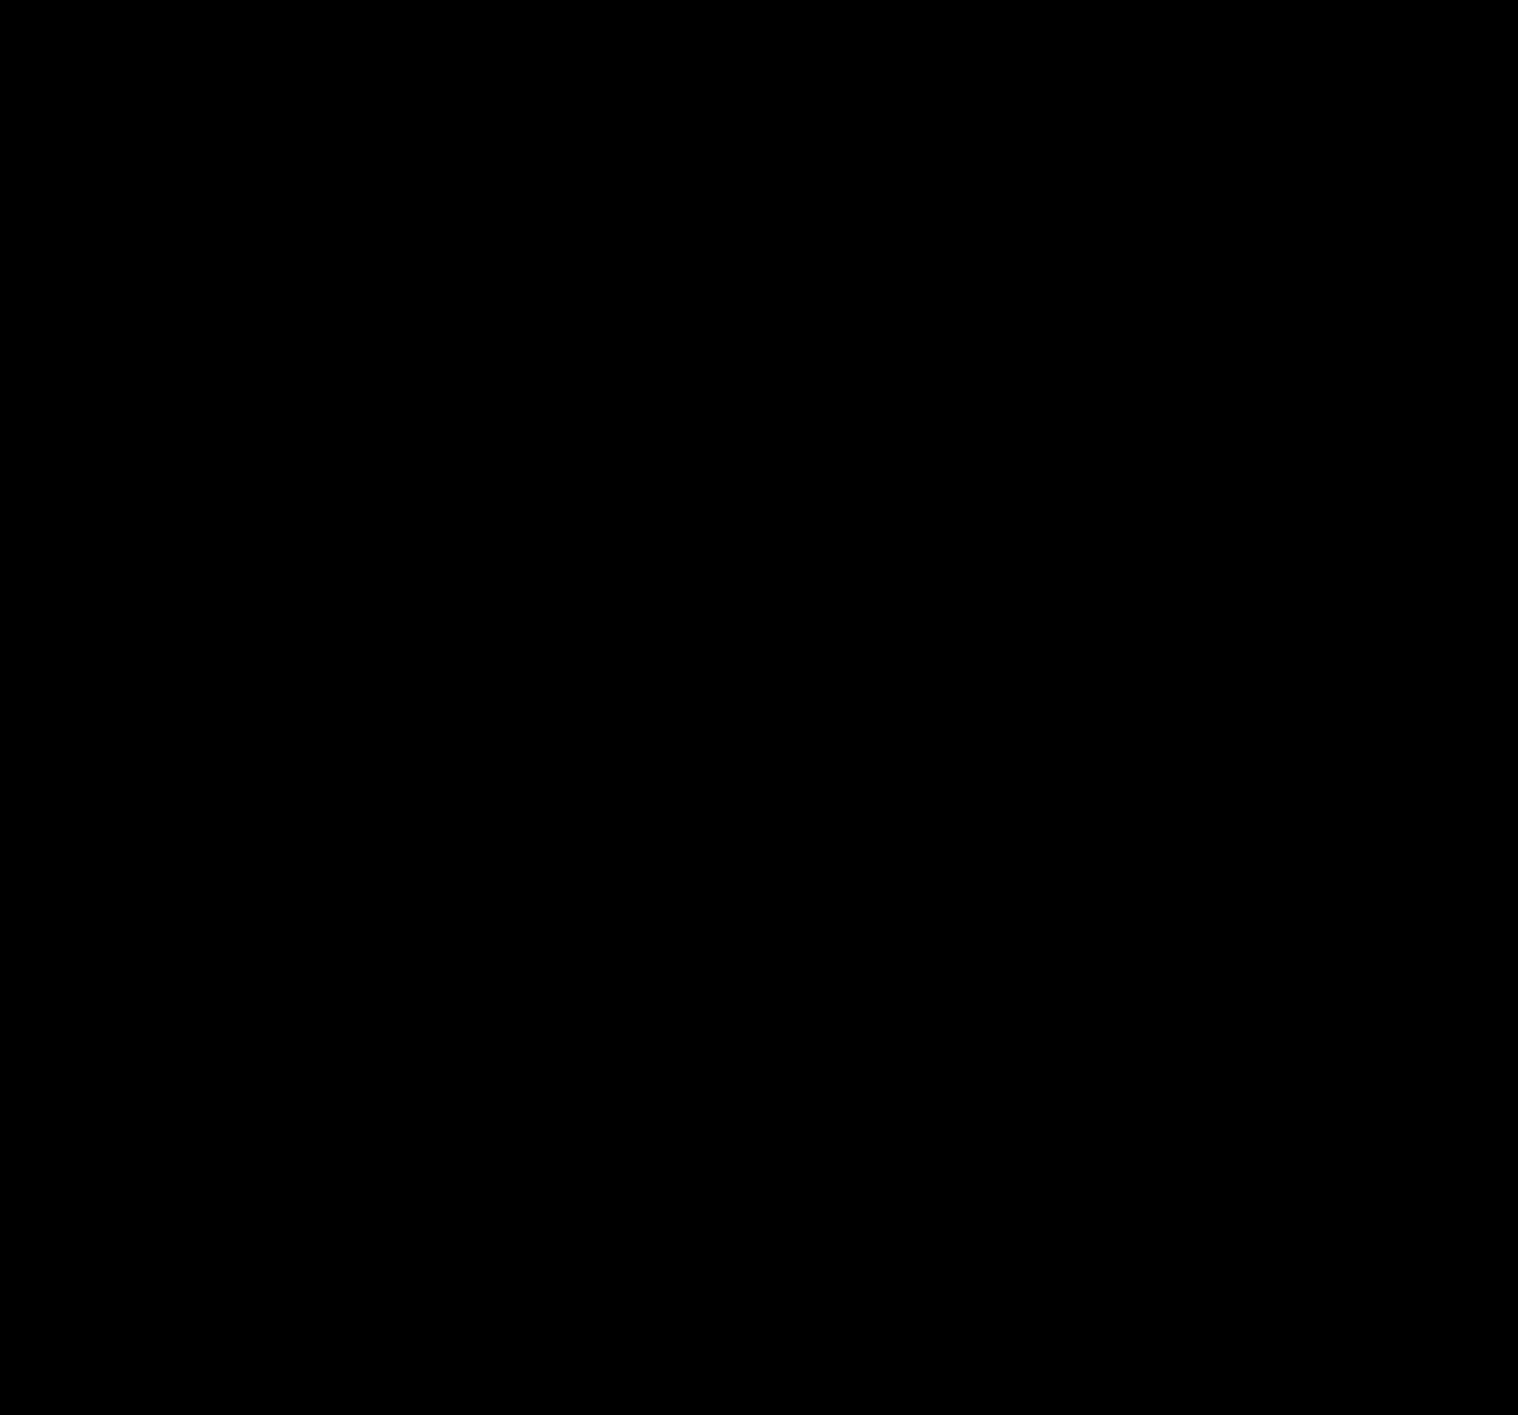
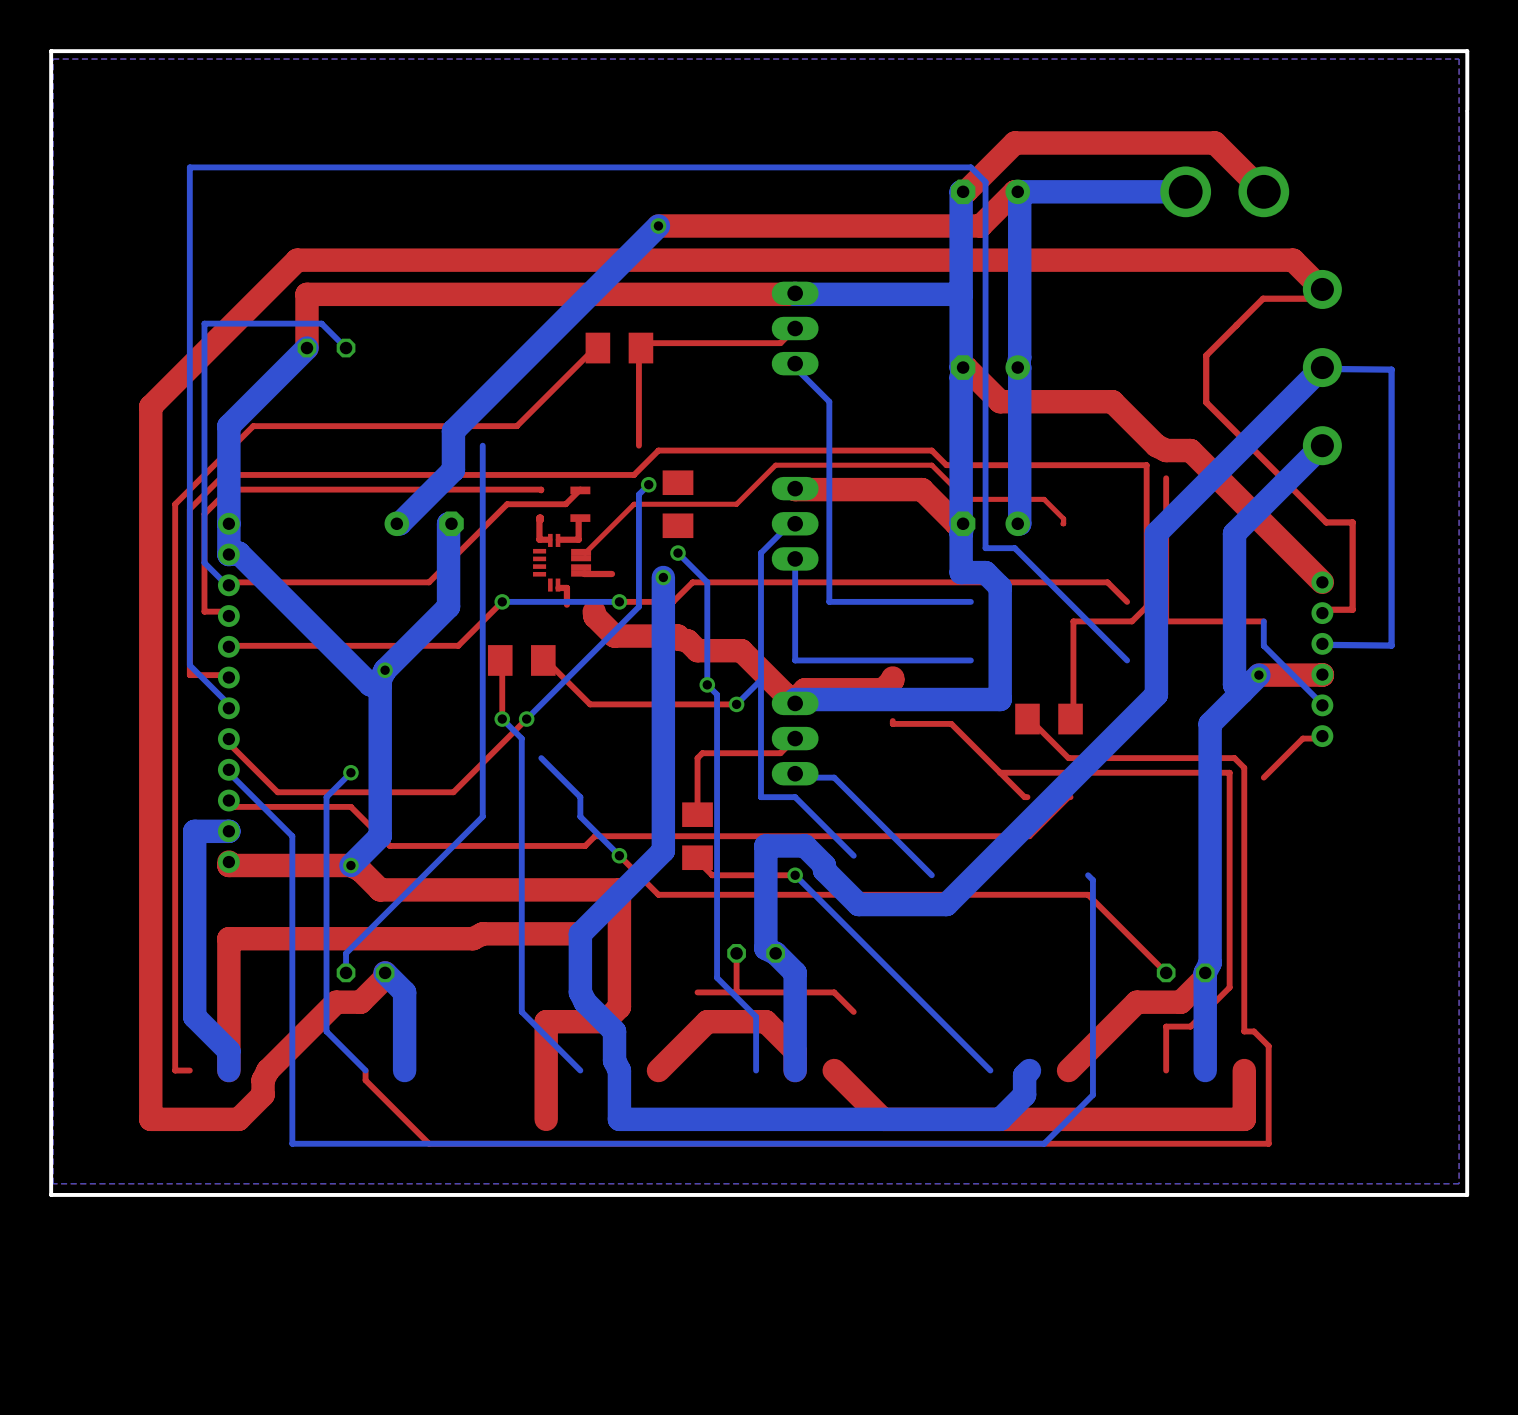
top zone outline: none -> (1459, 59) (1459, 1183) (53, 1183) (53, 59) (1459, 59)
bottom zone outline: none -> (1459, 59) (1459, 1183) (53, 1183) (53, 59) (1459, 59)
board edge: none -> (1467, 110) (1467, 51) (51, 51) (51, 1194) (1467, 1194) (1467, 111)
bottom track: none -> (963, 191) (961, 191) (961, 367) (963, 367) (961, 377) (961, 523) (963, 523) (961, 533) (961, 572) (985, 572) (1000, 587) (1000, 699) (795, 699) (795, 703)
part: none -> (990, 191)
top track: none -> (1017, 191) (1014, 191) (980, 225) (658, 225)
bottom track: none -> (1019, 191) (1019, 357) (1017, 367) (1019, 367) (1019, 523) (1017, 523)
bottom track: none -> (1185, 191) (1017, 191)
part: none -> (1185, 191)
top track: none -> (1263, 191) (1214, 143) (1014, 143) (966, 191) (963, 191)
part: none -> (1263, 191)
bottom track: none -> (658, 225) (453, 431) (453, 470) (399, 523) (396, 523)
via: none -> (658, 225)
top track: none -> (1320, 288) (1310, 298) (1263, 298) (1206, 355) (1206, 402) (1326, 522) (1352, 522) (1352, 609) (1323, 609)
top track: none -> (1322, 289) (1293, 260) (297, 260) (150, 406) (150, 1119) (238, 1119) (263, 1094) (263, 1080) (267, 1070) (336, 1002) (360, 1002) (385, 977) (385, 972)
part: none -> (1322, 289)
top track: none -> (795, 293) (306, 294) (306, 348)
bottom track: none -> (795, 293) (961, 294)
top track: none -> (795, 328) (780, 343) (648, 343) (643, 348) (638, 348) (638, 445)
part: none -> (795, 328)
bottom track: none -> (306, 348) (228, 426) (228, 554) (238, 553) (370, 684) (380, 684)
part: none -> (326, 348)
bottom track: none -> (346, 348) (321, 323) (204, 323) (204, 562) (228, 587) (228, 585)
top track: none -> (597, 348) (595, 348) (516, 426) (253, 426) (175, 504) (175, 1070) (189, 1070)
part: none -> (619, 348)
bottom track: none -> (795, 363) (795, 367) (829, 401) (829, 601) (970, 601)
top track: none -> (963, 367) (966, 367) (1000, 401) (1112, 401) (1156, 445) (1166, 450) (1190, 450) (1322, 582)
part: none -> (990, 367)
bottom track: none -> (1322, 367) (1156, 533) (1156, 694) (946, 904) (858, 904) (824, 870) (824, 865) (804, 845) (765, 845) (765, 948) (775, 953) (795, 972) (795, 1070)
part: none -> (1322, 367)
bottom track: none -> (1320, 368) (1391, 369) (1391, 645) (1319, 644) (1319, 646)
bottom track: none -> (482, 445) (482, 816) (346, 953) (346, 972)
bottom track: none -> (1322, 445) (1234, 533) (1234, 684) (1241, 692)
part: none -> (1322, 445)
top track: none -> (1166, 478) (1166, 621) (1263, 621)
bottom track: none -> (648, 484) (638, 494) (638, 606) (526, 719)
via: none -> (648, 484)
top track: none -> (795, 488) (922, 489) (956, 523) (963, 523)
top track: none -> (541, 490) (228, 489) (204, 514) (204, 611) (228, 611) (228, 616)
top track: none -> (580, 490) (565, 504) (507, 504) (429, 582) (228, 582) (228, 585)
part: none -> (580, 504)
part: none -> (678, 504)
top track: none -> (539, 518) (540, 517) (539, 539) (549, 539)
top track: none -> (578, 518) (578, 539) (558, 539)
part: none -> (424, 523)
bottom track: none -> (451, 523) (448, 523) (448, 606) (385, 670) (380, 679) (380, 836) (350, 865)
bottom track: none -> (795, 523) (790, 523) (760, 553) (760, 797) (795, 797) (853, 855)
part: none -> (795, 523)
part: none -> (990, 523)
top track: none -> (1062, 523) (1063, 518) (1044, 499) (966, 499) (931, 465) (775, 465) (736, 504) (634, 504) (585, 553) (581, 551)
bottom track: none -> (678, 553) (707, 582) (707, 684) (717, 694) (717, 977) (756, 1016) (756, 1070)
via: none -> (678, 553)
bottom track: none -> (795, 558) (795, 660) (970, 660)
part: none -> (562, 562)
top track: none -> (584, 573) (612, 574)
bottom track: none -> (663, 577) (663, 850) (580, 933) (580, 992) (585, 1002) (614, 1031) (614, 1060) (619, 1070) (619, 1119) (1000, 1119) (1024, 1094) (1024, 1075) (1029, 1070)
via: none -> (663, 577)
top track: none -> (558, 587) (566, 587) (566, 604)
top track: none -> (502, 601) (458, 645) (228, 646)
via: none -> (502, 601)
bottom track: none -> (619, 601) (502, 601)
via: none -> (619, 601)
top track: none -> (1127, 601) (1107, 582) (692, 582) (673, 601) (619, 601)
top track: none -> (594, 611) (595, 616) (614, 636) (678, 636) (678, 638) (687, 640) (697, 650) (741, 650) (795, 703) (795, 699) (804, 689) (883, 689) (892, 677)
bottom track: none -> (1263, 621) (1263, 645) (1322, 705)
part: none -> (1322, 659)
top track: none -> (500, 660) (502, 660) (502, 719)
part: none -> (521, 660)
top track: none -> (543, 660) (546, 660) (590, 704) (736, 704)
bottom track: none -> (1127, 660) (1014, 548) (985, 548) (985, 182) (970, 167) (189, 167) (189, 665) (228, 704) (228, 708)
via: none -> (385, 670)
top track: none -> (1322, 674) (1258, 675)
bottom track: none -> (1258, 675) (1210, 723) (1210, 963) (1205, 972) (1205, 1070)
via: none -> (1258, 675)
top track: none -> (228, 677) (228, 675) (189, 675) (189, 509) (224, 474) (634, 474) (658, 450) (931, 450) (946, 465) (1146, 465) (1146, 606) (1132, 621) (1073, 621) (1073, 719) (1070, 719)
bottom track: none -> (760, 679) (736, 704)
via: none -> (707, 684)
part: none -> (228, 692)
via: none -> (736, 704)
bottom track: none -> (502, 719) (521, 738) (521, 1011) (580, 1070)
via: none -> (502, 719)
top track: none -> (526, 719) (453, 792) (277, 792) (228, 743) (228, 739)
via: none -> (526, 719)
top track: none -> (1027, 719) (1068, 758) (1234, 758) (1244, 767) (1244, 1031) (1254, 1031) (1268, 1046) (1268, 1143) (429, 1143) (365, 1080) (365, 1070)
part: none -> (1049, 719)
top track: none -> (892, 721) (892, 723) (951, 723) (1024, 797) (1027, 797)
top track: none -> (1322, 736) (1322, 738) (1302, 738) (1263, 777)
top track: none -> (795, 738) (780, 753) (702, 753) (697, 758) (697, 814)
part: none -> (795, 738)
bottom track: none -> (541, 758) (580, 797) (580, 816) (619, 855)
bottom track: none -> (228, 769) (228, 772) (292, 836) (292, 1143) (1044, 1143) (1092, 1094) (1092, 880) (1088, 875)
bottom track: none -> (350, 772) (326, 797) (326, 1031) (365, 1070)
via: none -> (350, 772)
top track: none -> (1000, 772) (1229, 772) (1229, 987) (1190, 1026) (1166, 1026) (1166, 1070)
bottom track: none -> (795, 773) (795, 777) (834, 777) (931, 875)
top track: none -> (1070, 797) (1029, 836) (595, 836) (585, 845) (389, 845) (350, 806) (233, 806) (228, 800)
bottom track: none -> (228, 831) (194, 831) (194, 1016) (228, 1051) (228, 1070)
part: none -> (697, 836)
top track: none -> (619, 855) (658, 894) (1088, 894) (1166, 972)
via: none -> (619, 855)
top track: none -> (697, 857) (697, 860) (712, 875) (795, 875)
top track: none -> (228, 862) (228, 865) (350, 865) (360, 870) (380, 889) (619, 889) (619, 1007) (604, 1021) (546, 1021) (546, 1119)
via: none -> (350, 865)
bottom track: none -> (795, 875) (990, 1070)
via: none -> (795, 875)
top track: none -> (580, 933) (482, 933) (472, 938) (228, 938) (228, 1070)
top track: none -> (736, 953) (736, 992)
part: none -> (756, 953)
part: none -> (365, 972)
bottom track: none -> (385, 972) (404, 992) (404, 1070)
part: none -> (1185, 972)
top track: none -> (1205, 972) (1205, 977) (1180, 1002) (1136, 1002) (1068, 1070)
top track: none -> (697, 992) (834, 992) (853, 1011)
top track: none -> (795, 1070) (795, 1051) (765, 1021) (707, 1021) (658, 1070)
top track: none -> (1244, 1070) (1244, 1119) (883, 1119) (834, 1070)

